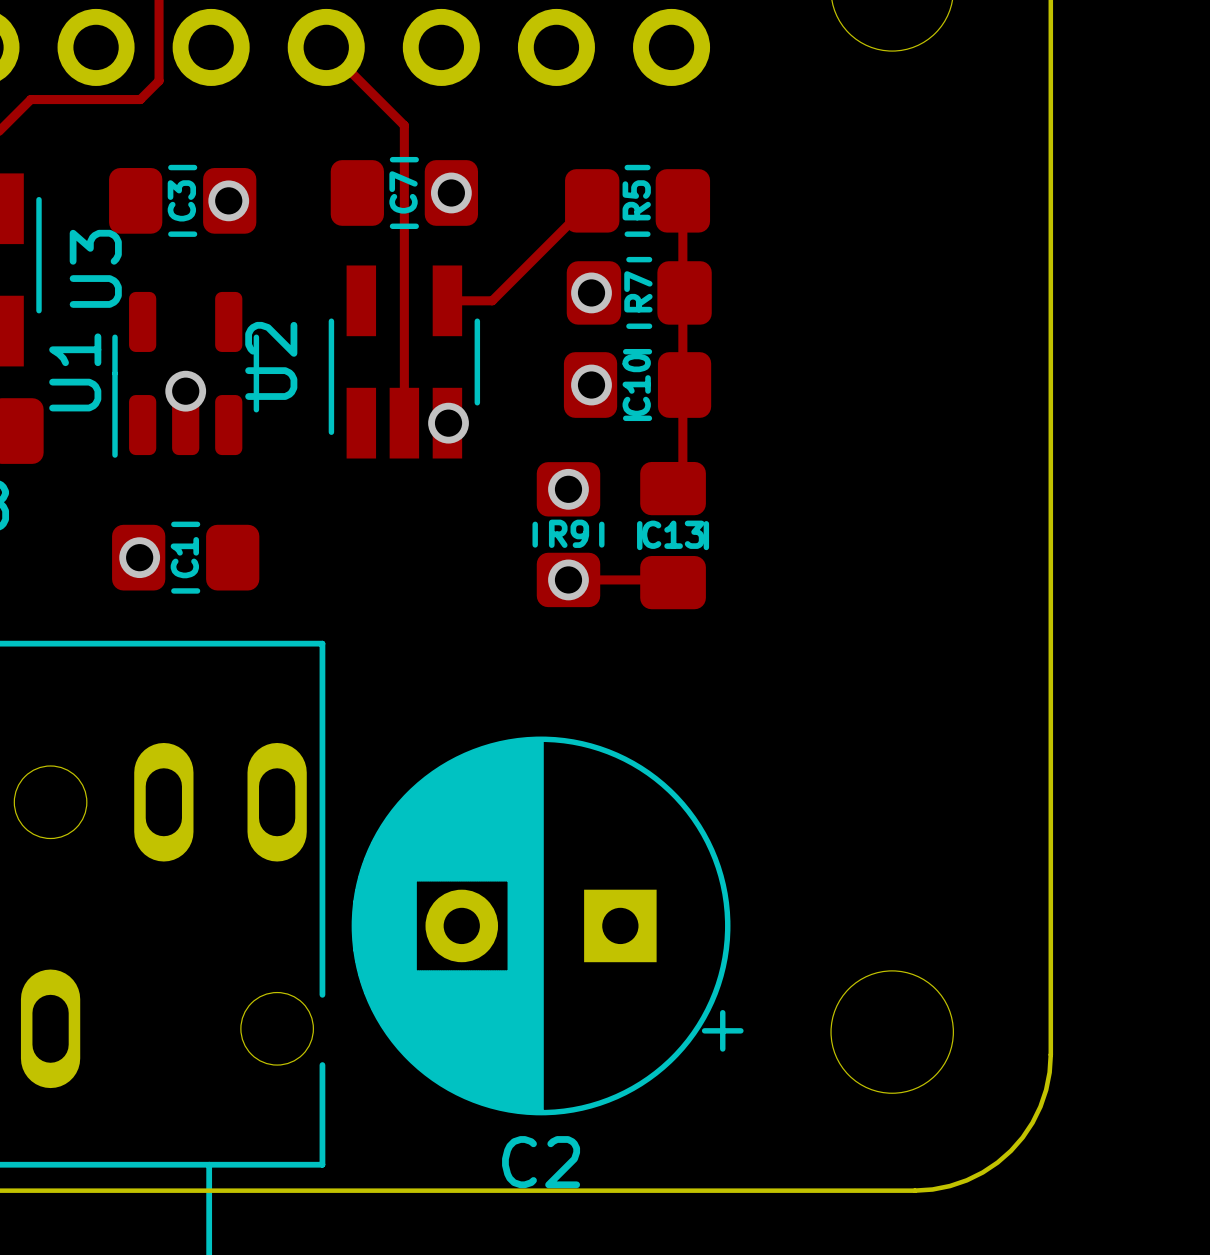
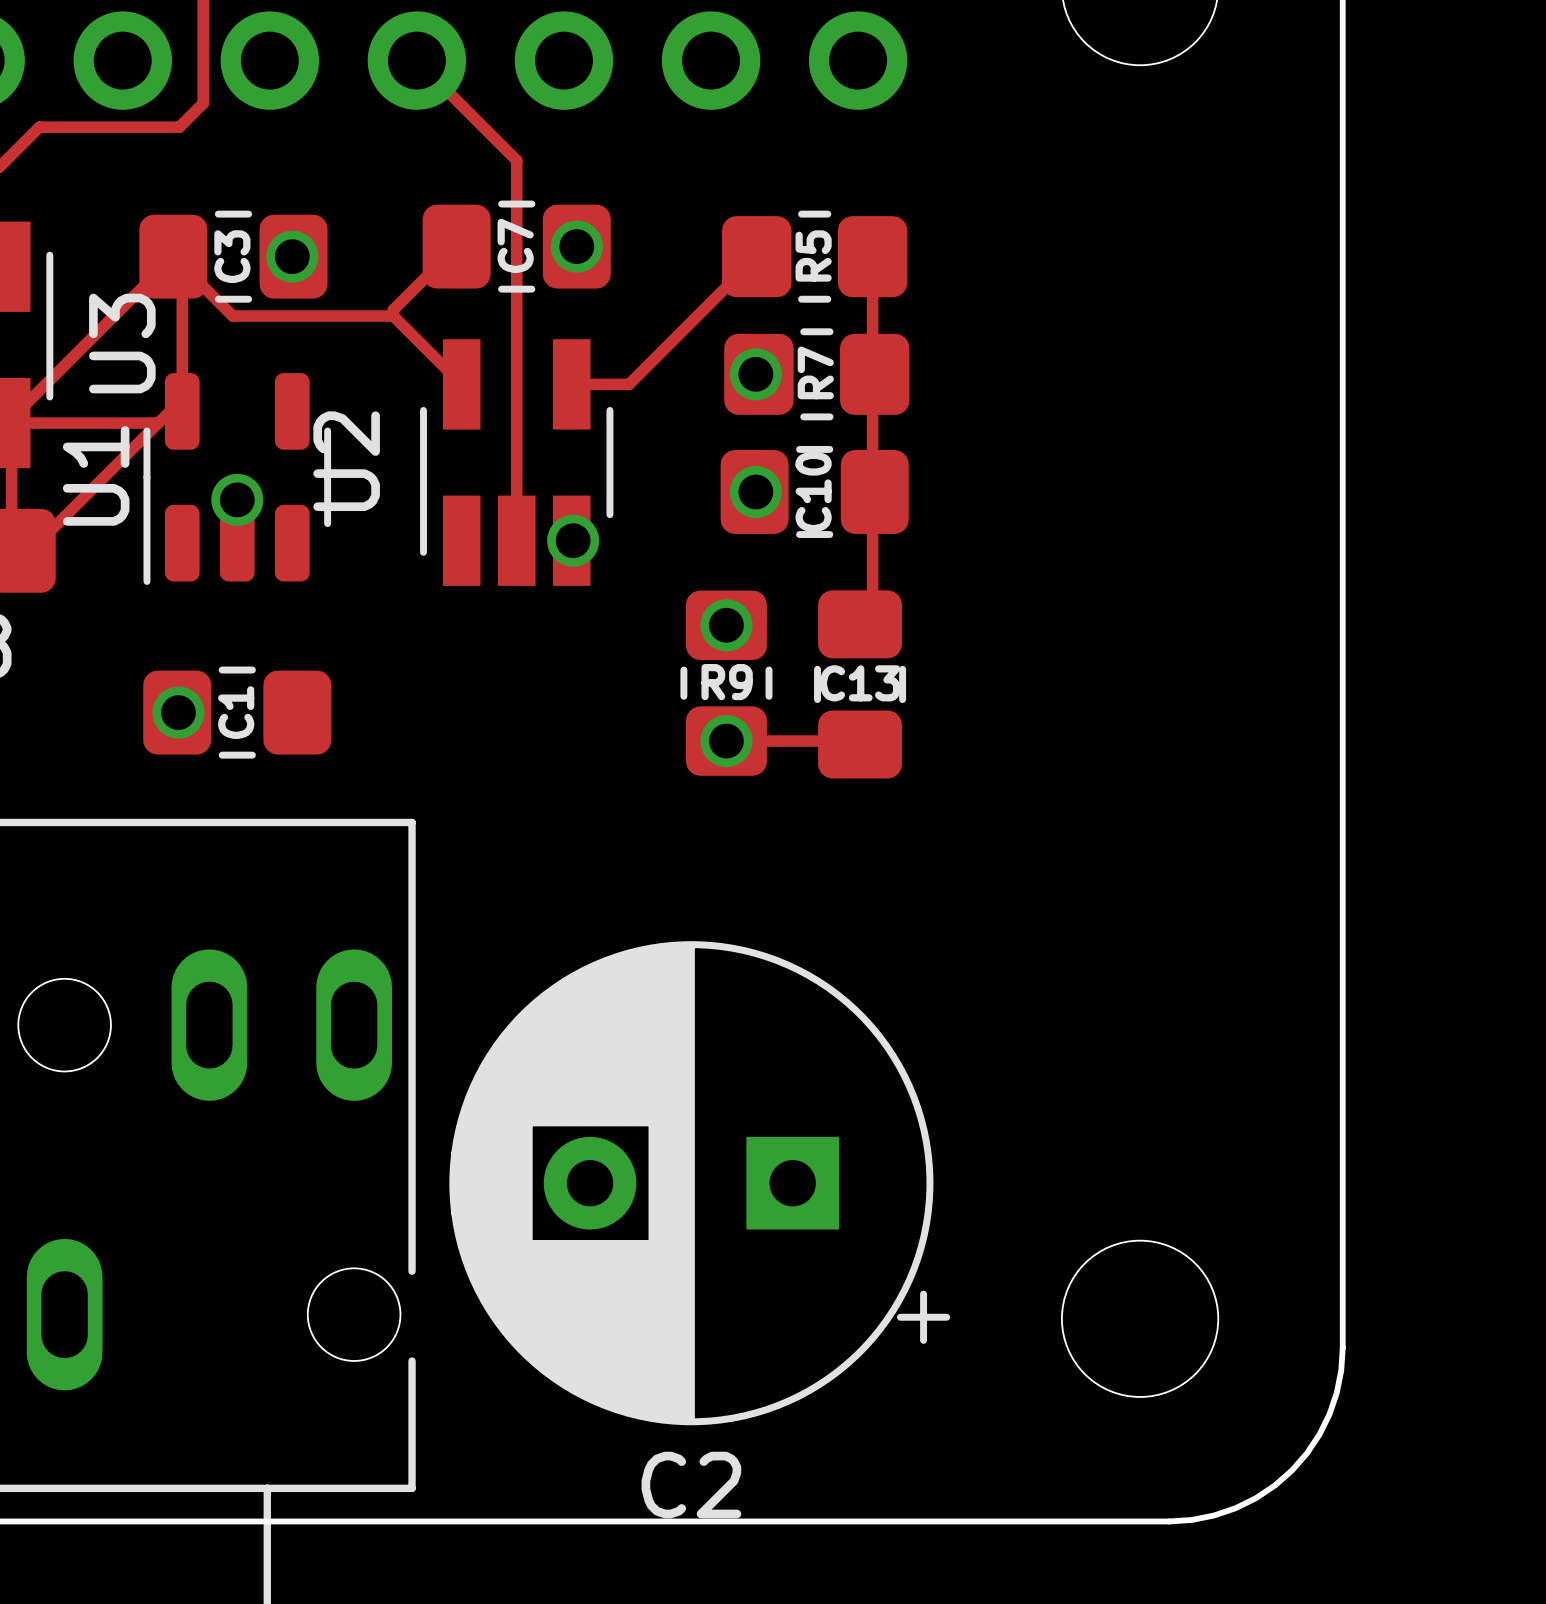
track: none -> (456, 246) (393, 309) (393, 316)
track: none -> (182, 265) (182, 399) (30, 550)
track: none -> (393, 316) (232, 316) (173, 256) (11, 418)
track: none -> (393, 316) (461, 384)
track: none -> (158, 423) (11, 423) (11, 540)

